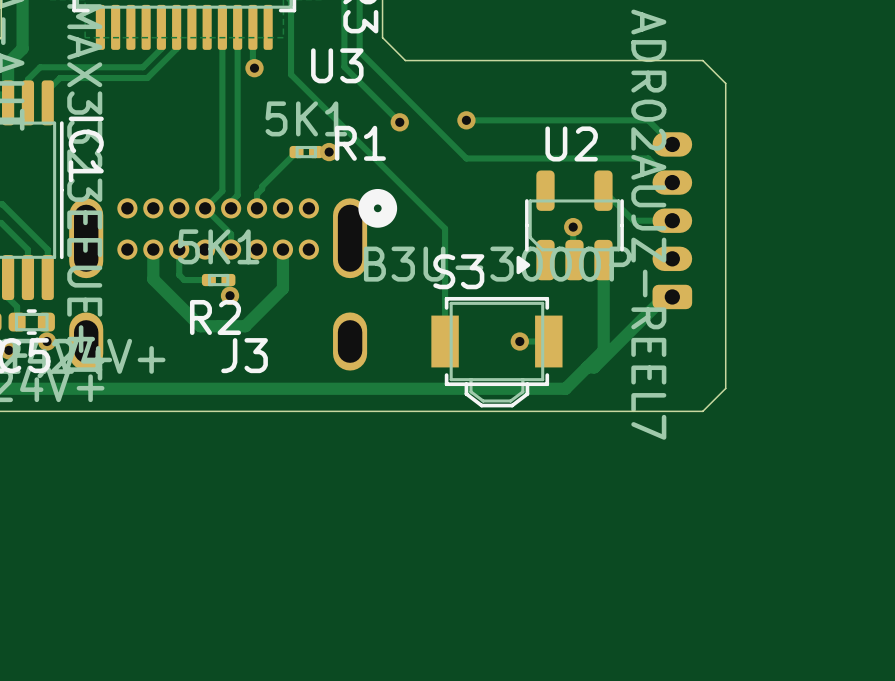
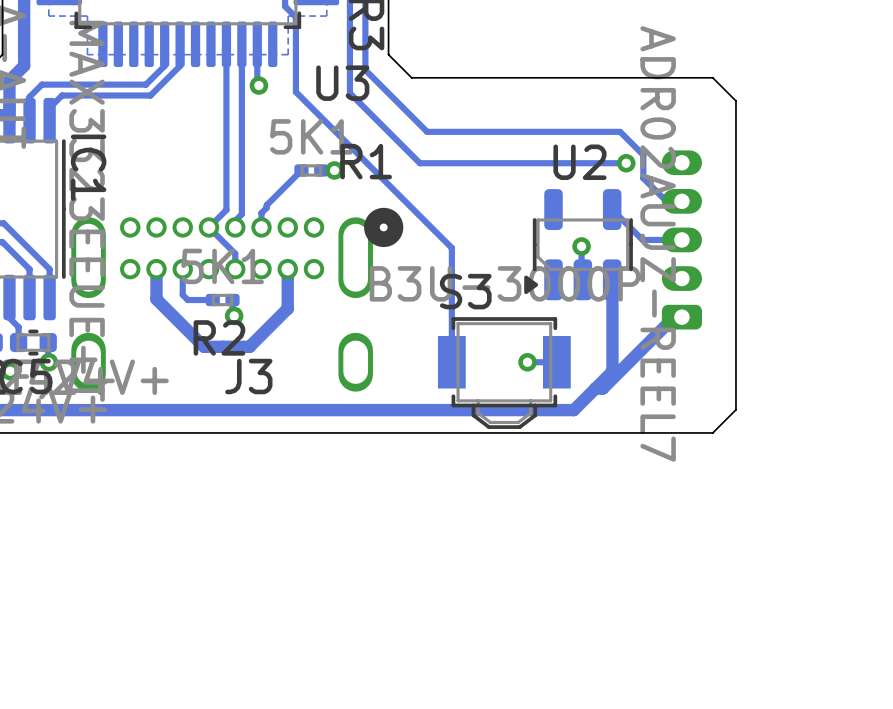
track: (359, 51) (466, 158) (648, 158) (672, 182) -> (365, 68) (427, 131) (620, 131) (643, 155) (643, 178) (666, 201) (681, 201)
track: (344, 66) (399, 122) -> (349, 84) (349, 93) (419, 163) (626, 163)
track: (466, 120) (648, 120) (672, 144) -> none
via: (466, 120) -> none
via: (399, 122) -> none
via: none -> (626, 163)

